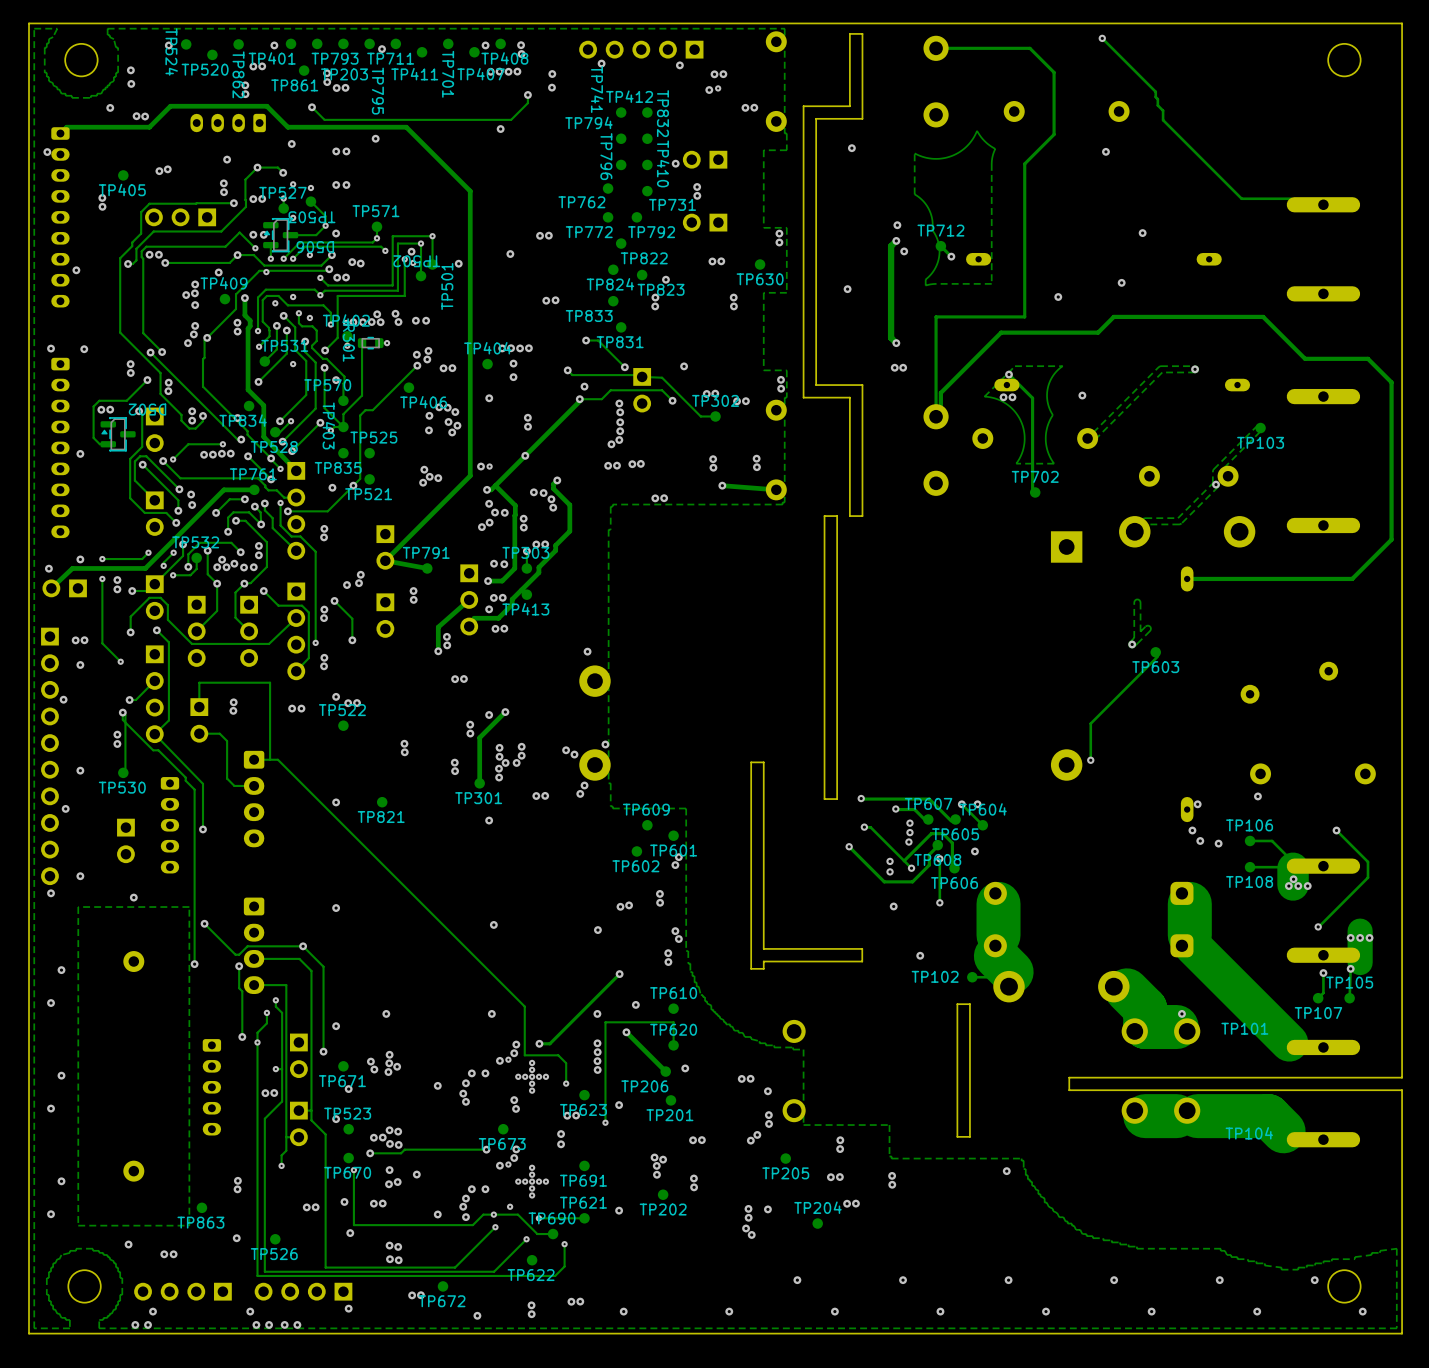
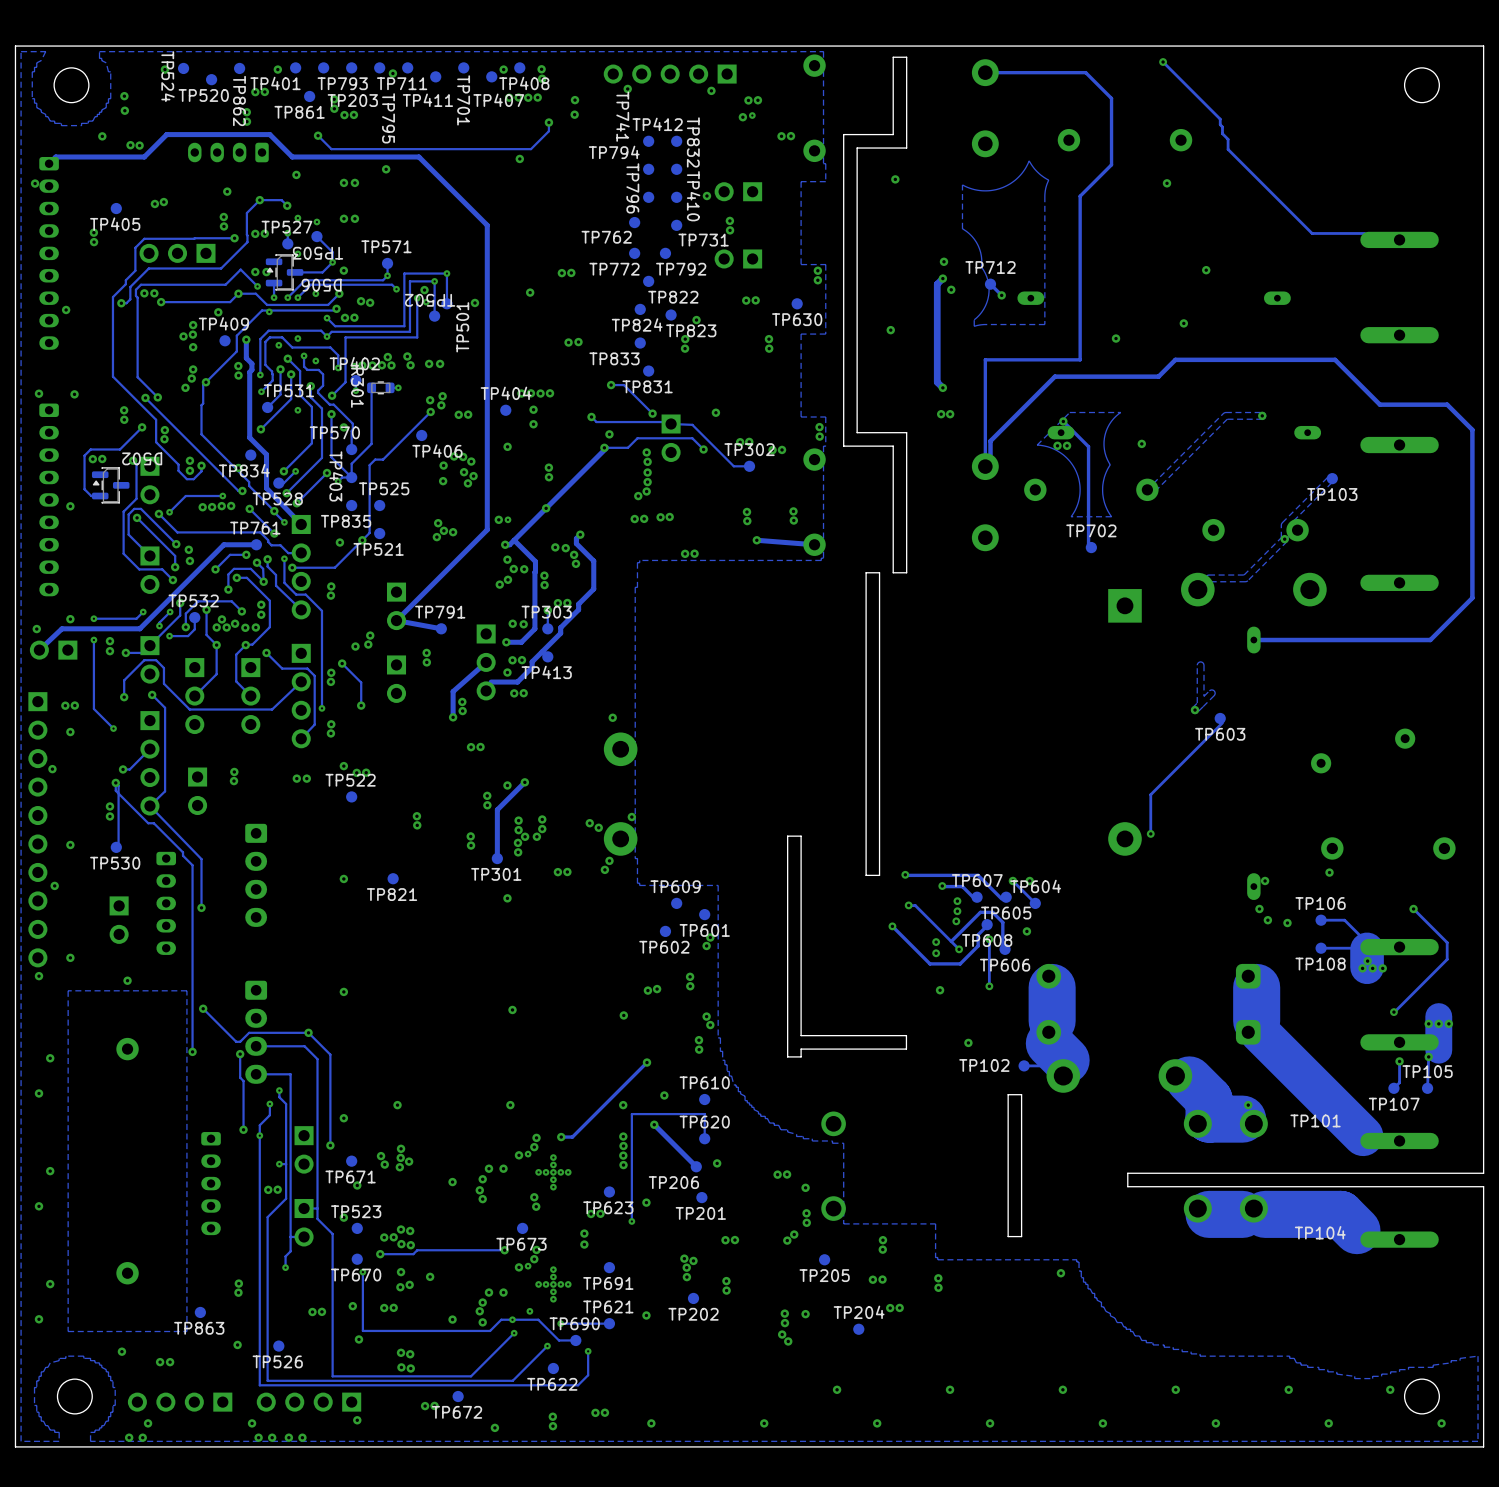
track: (199, 707) (199, 682) (270, 682) (270, 759) -> none
track: (199, 733) (219, 733) (227, 741) (227, 778) (234, 785) (254, 785) -> none
track: (254, 759) (277, 759) (524, 1006) (524, 1055) (558, 1055) (566, 1063) (566, 1083) -> none
via: (566, 1083) -> none

